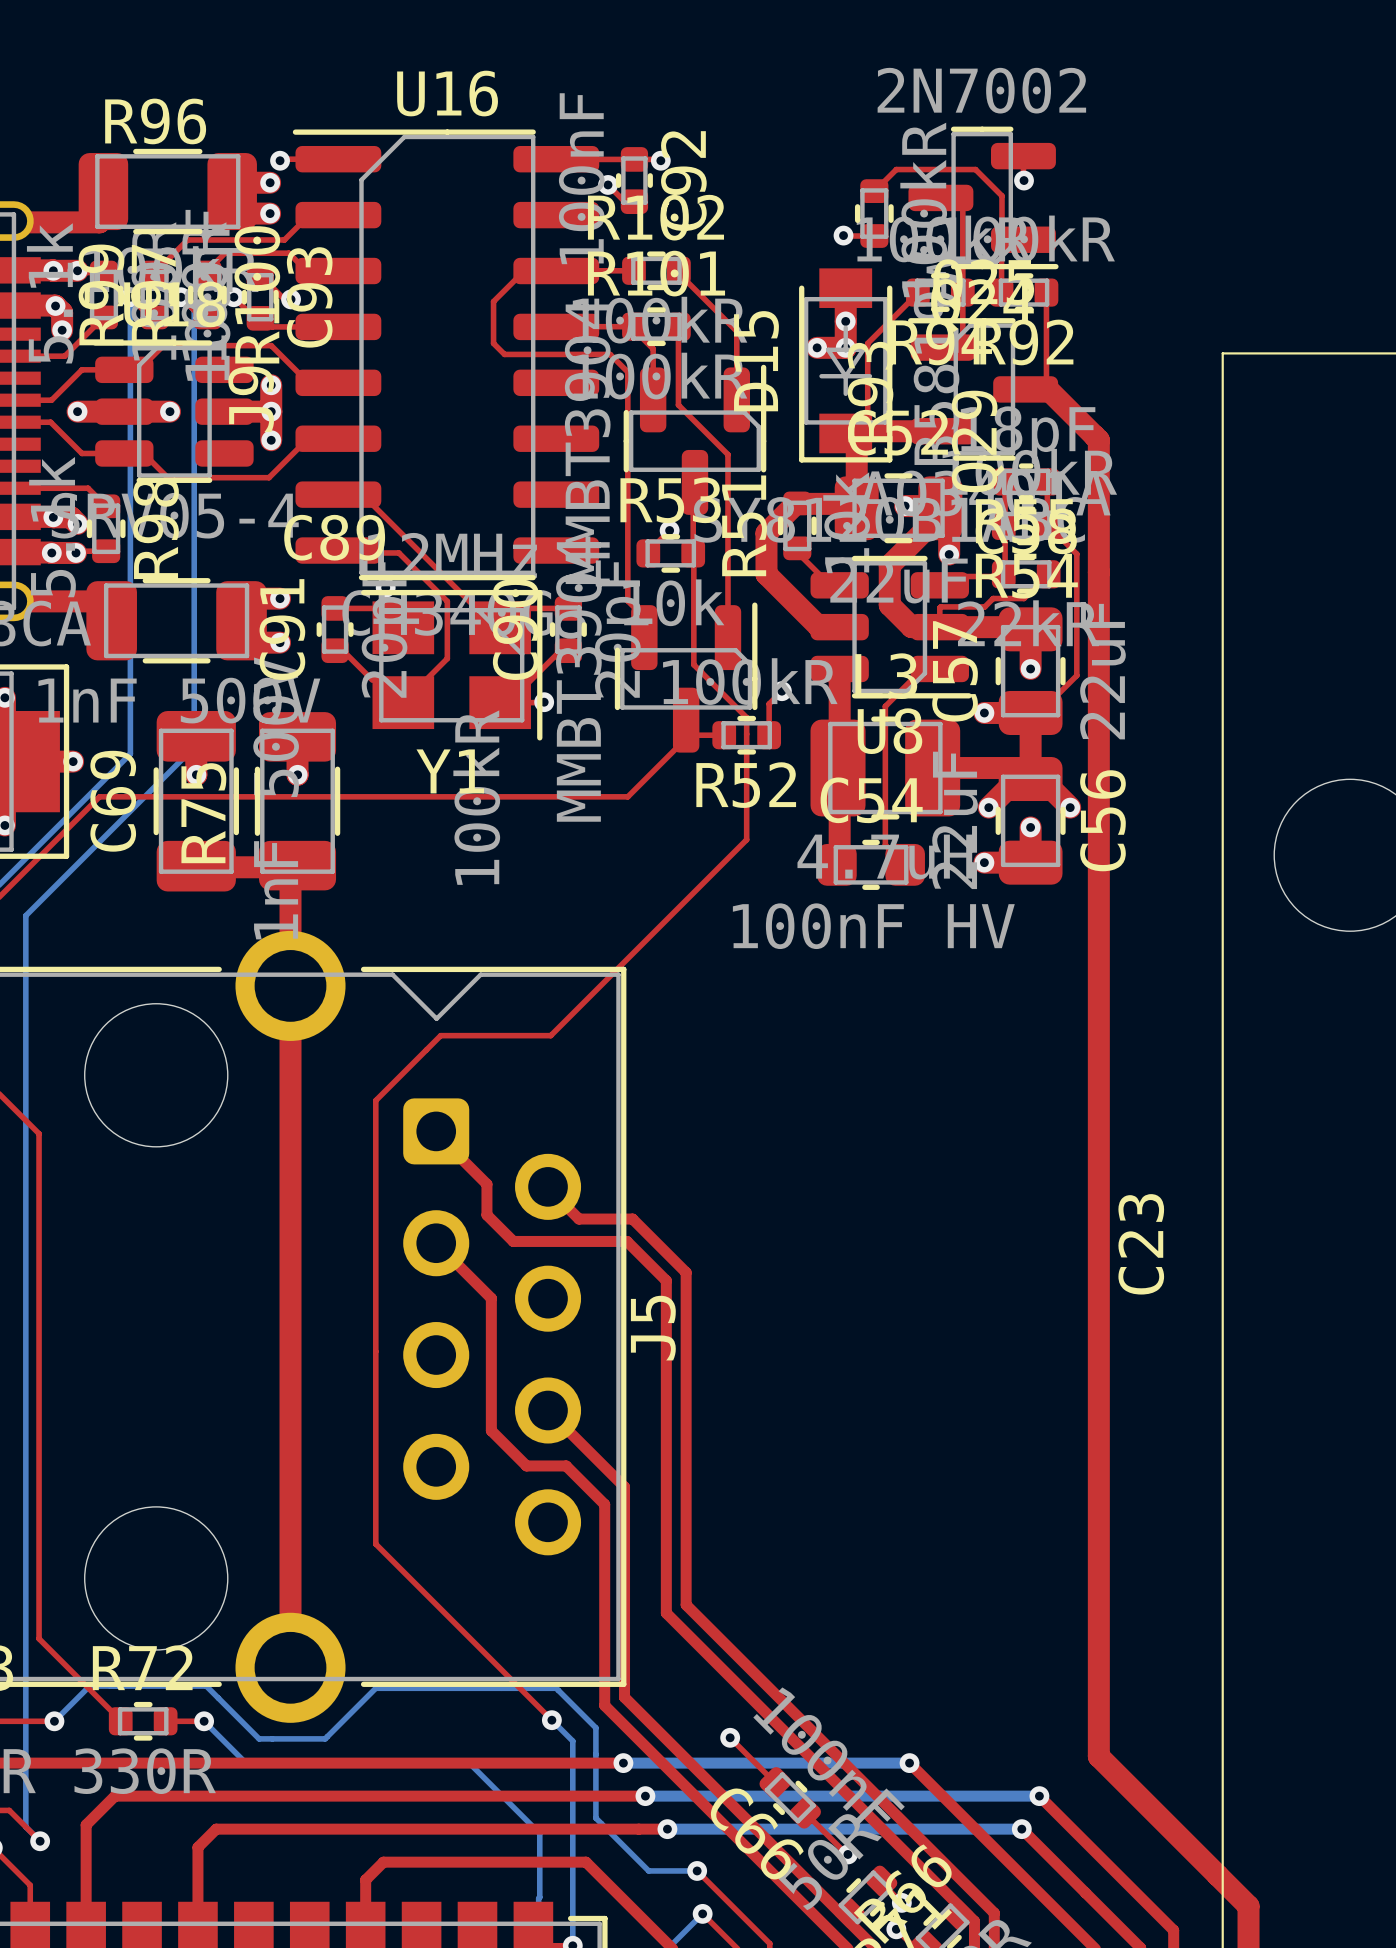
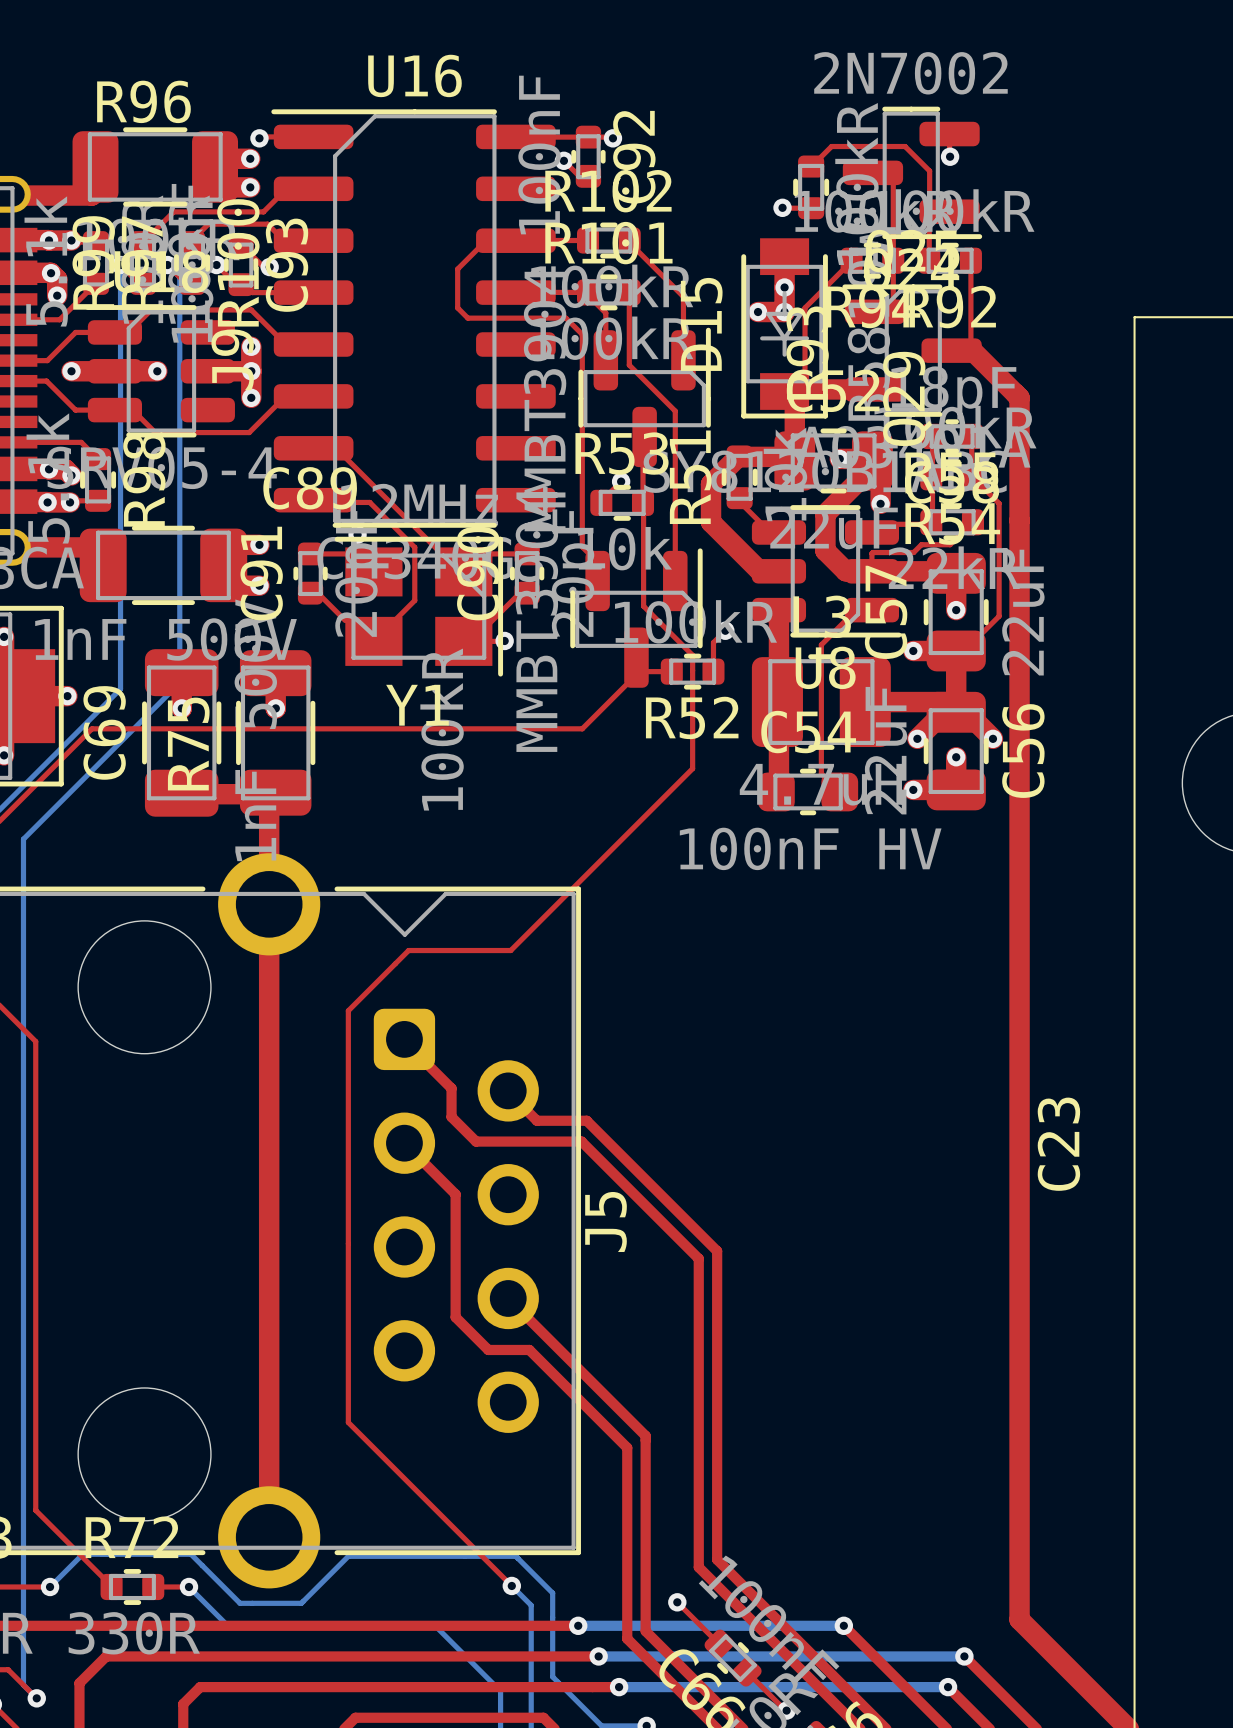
top track: (686, 1272) (686, 1604) (773, 1691) -> (636, 1170) (717, 1251) (717, 1559)
top track: (666, 1280) (666, 1613) (753, 1700) -> (618, 1178) (698, 1258) (698, 1567)
top track: (566, 1465) (604, 1504) (604, 1705) (676, 1777) -> (525, 1349) (529, 1349) (627, 1447) (627, 1638)
top track: (624, 1486) (624, 1697) (696, 1768) -> (579, 1369) (645, 1435) (645, 1631)

